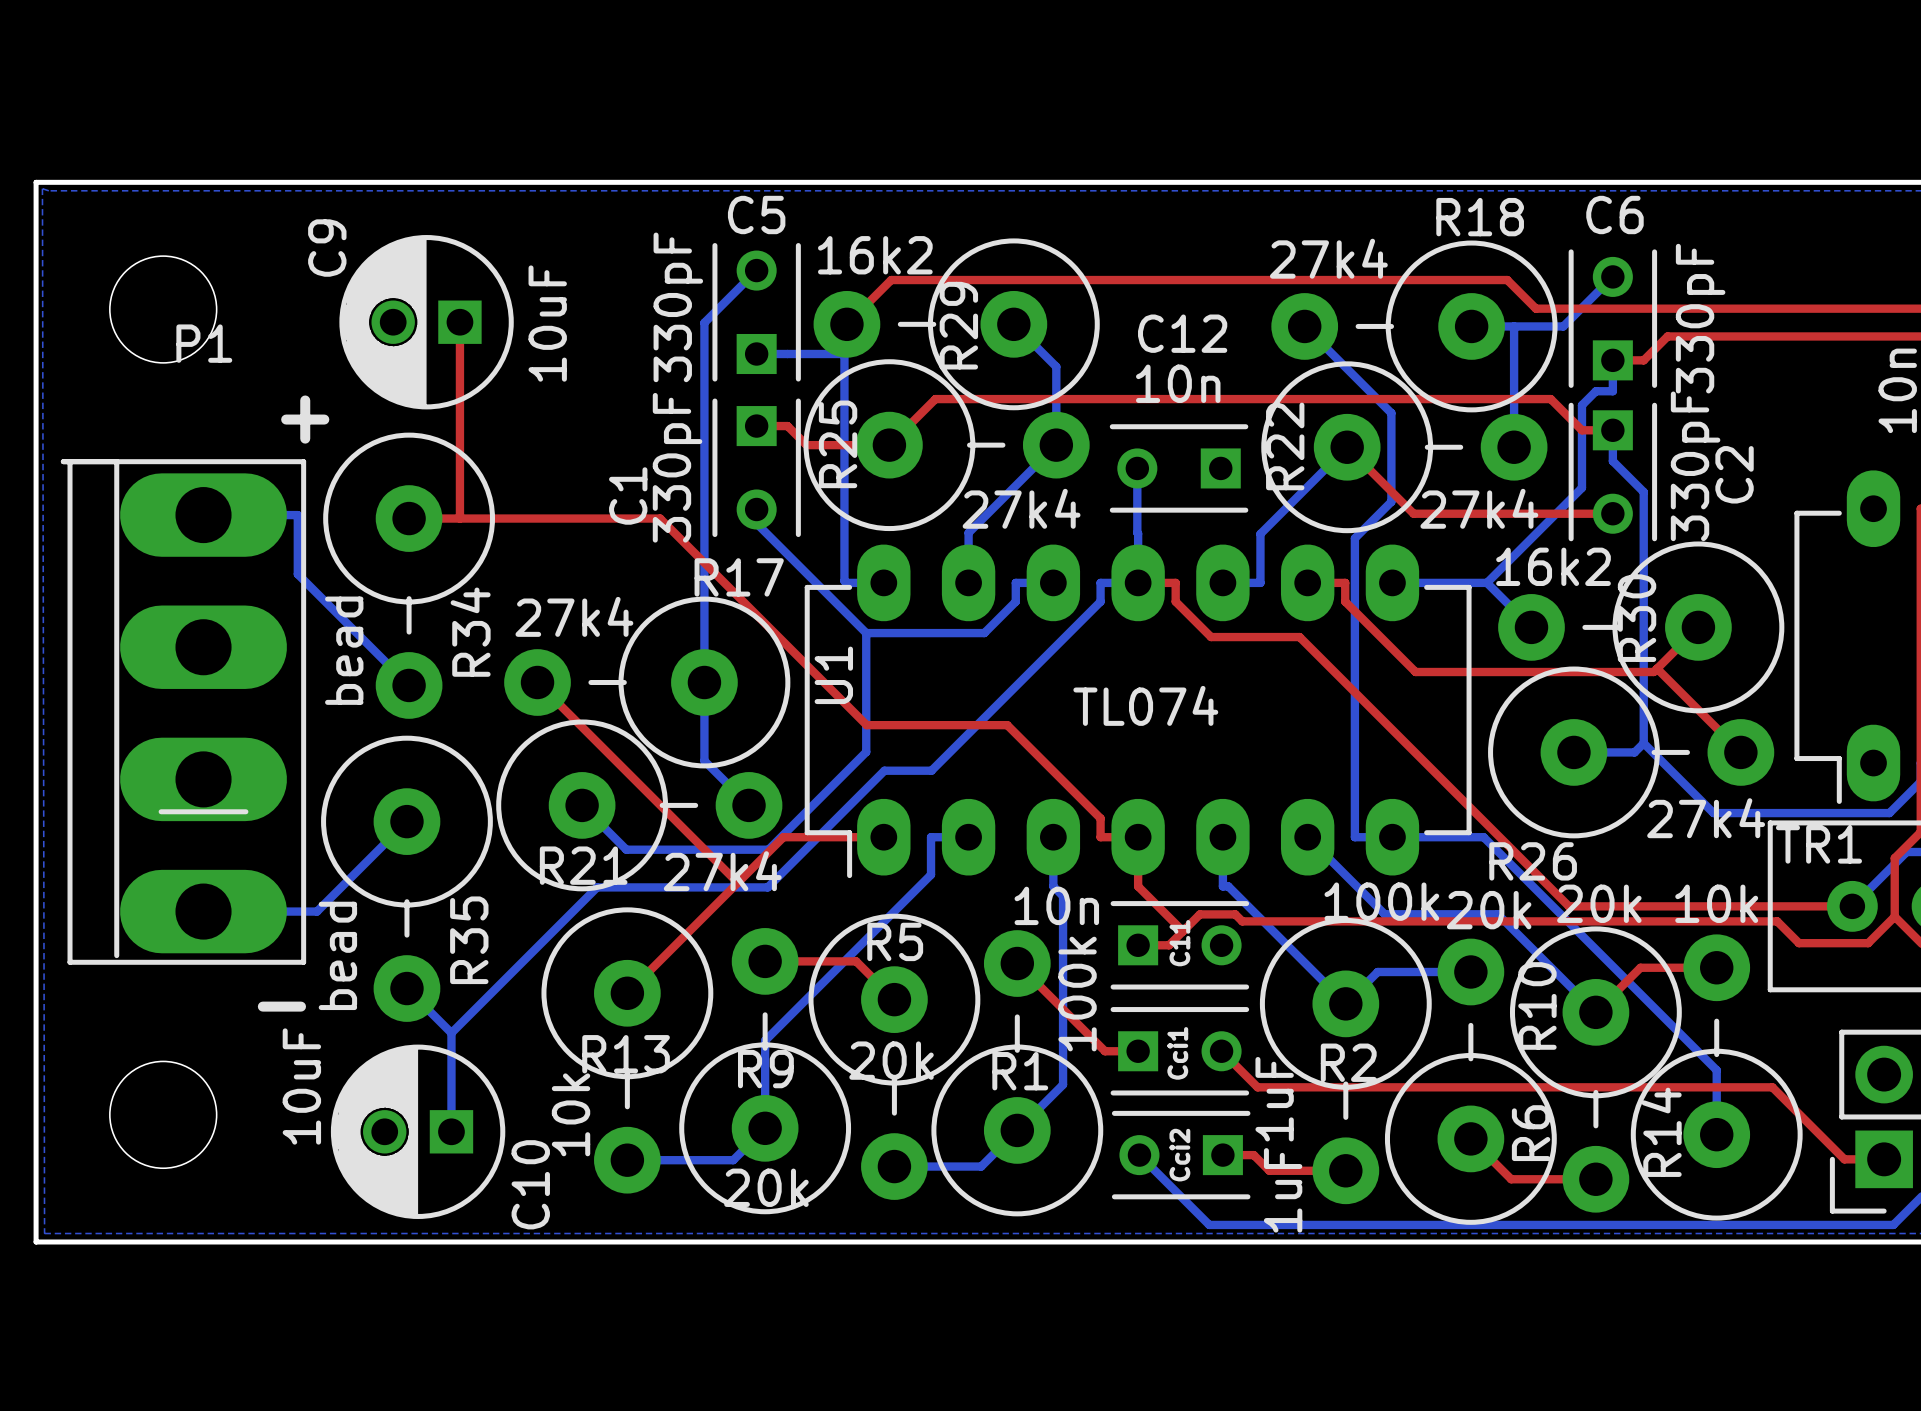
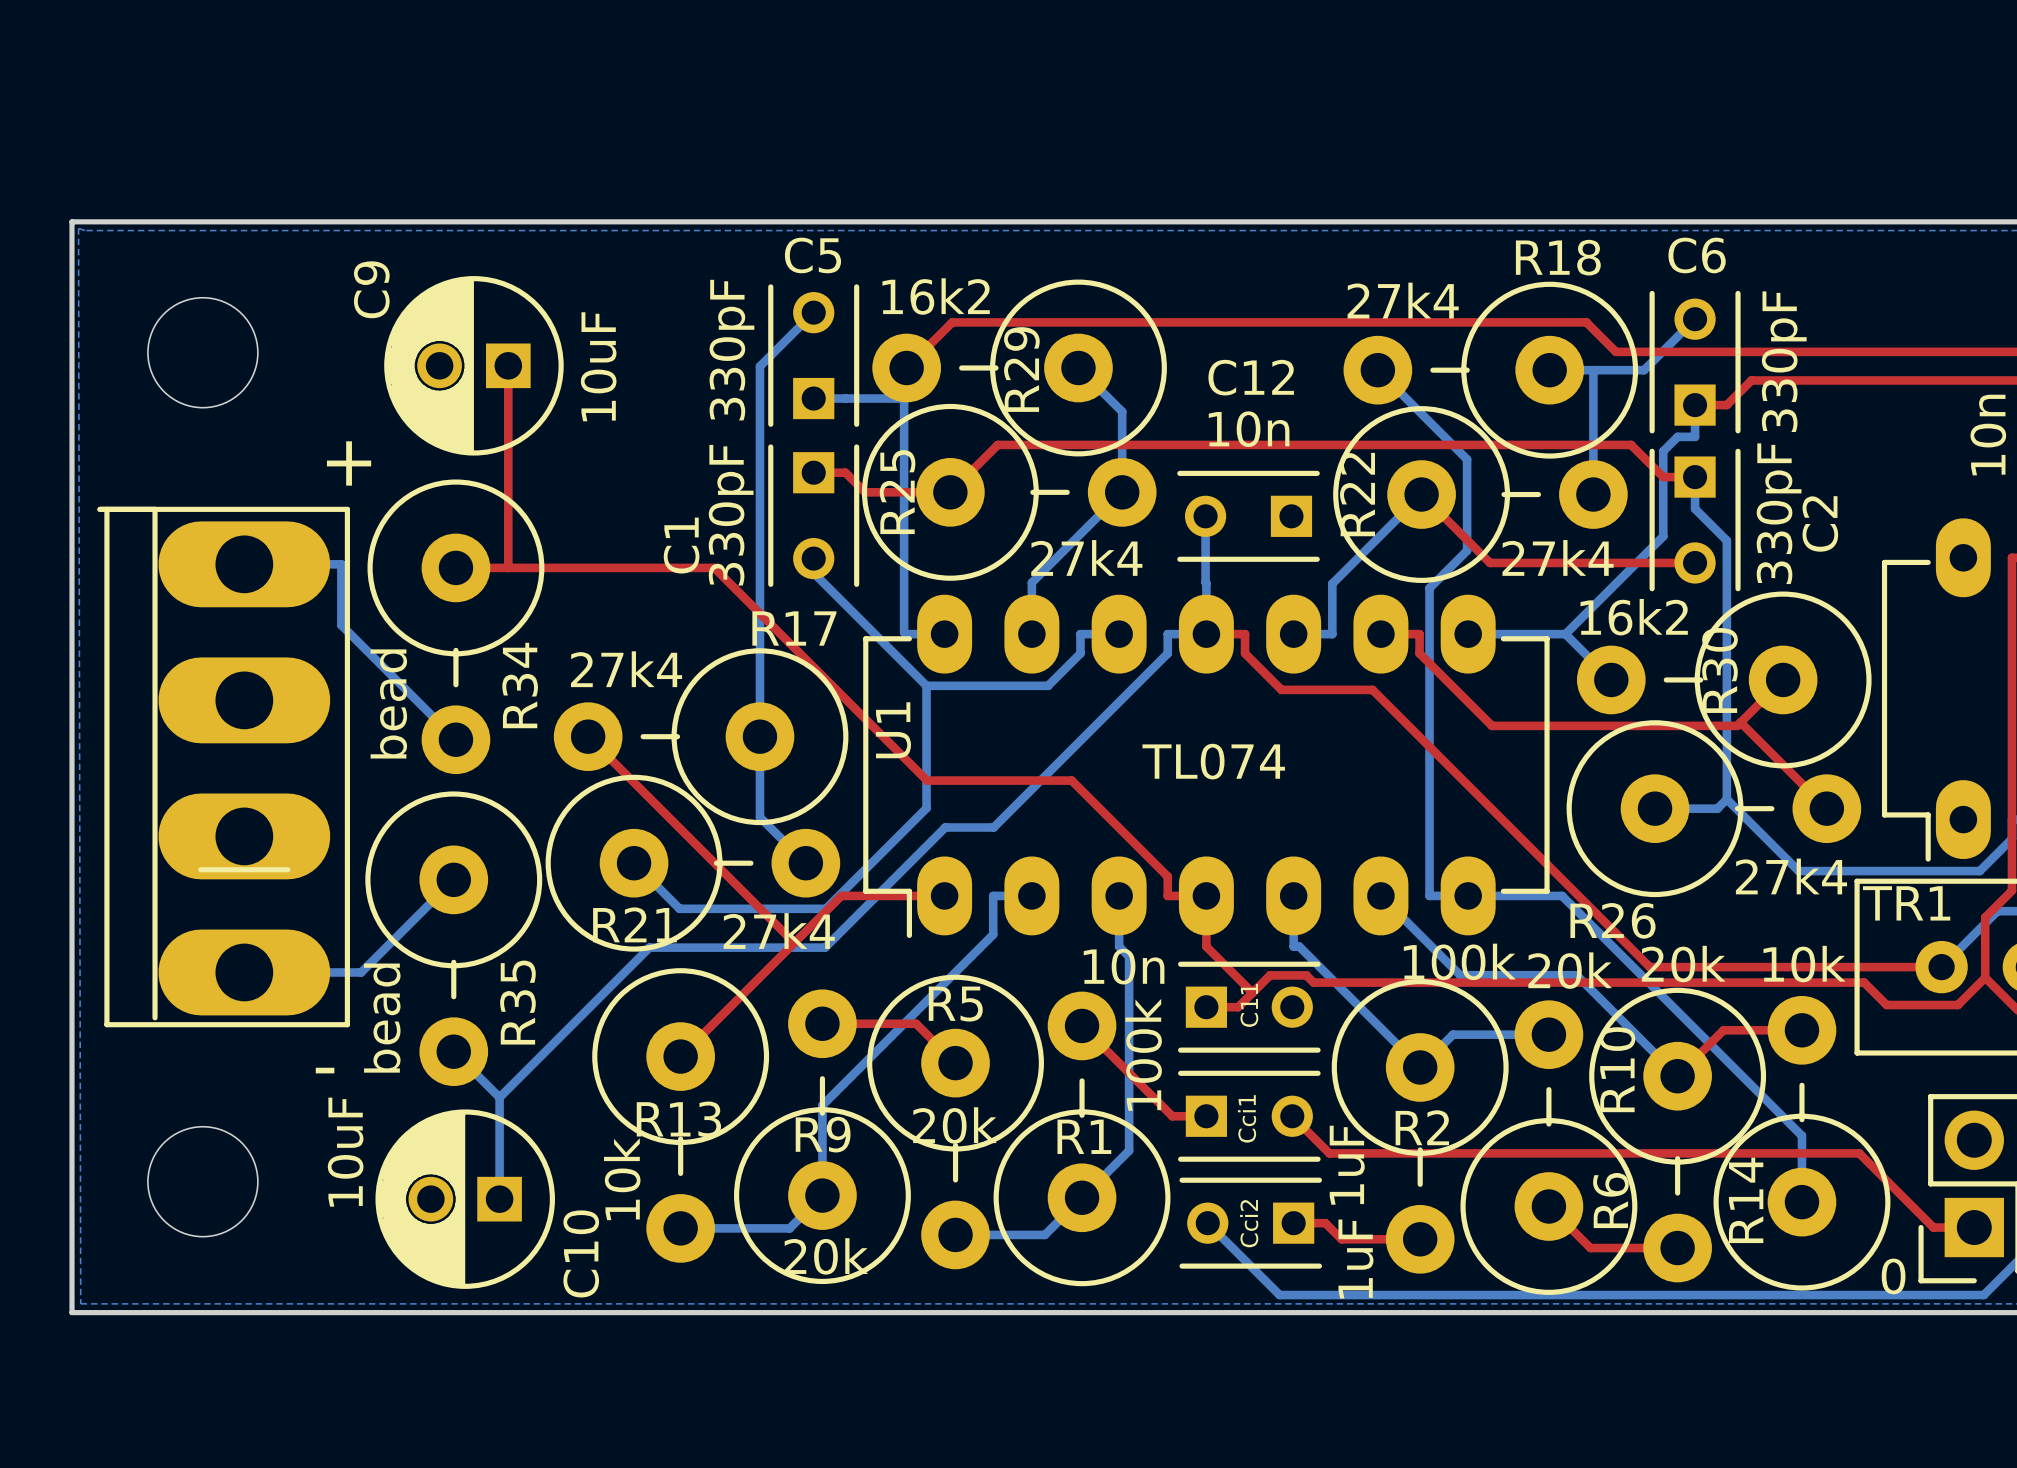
P1 name: P1 (204, 343) -> none
text: none -> 0 (1893, 1276)

